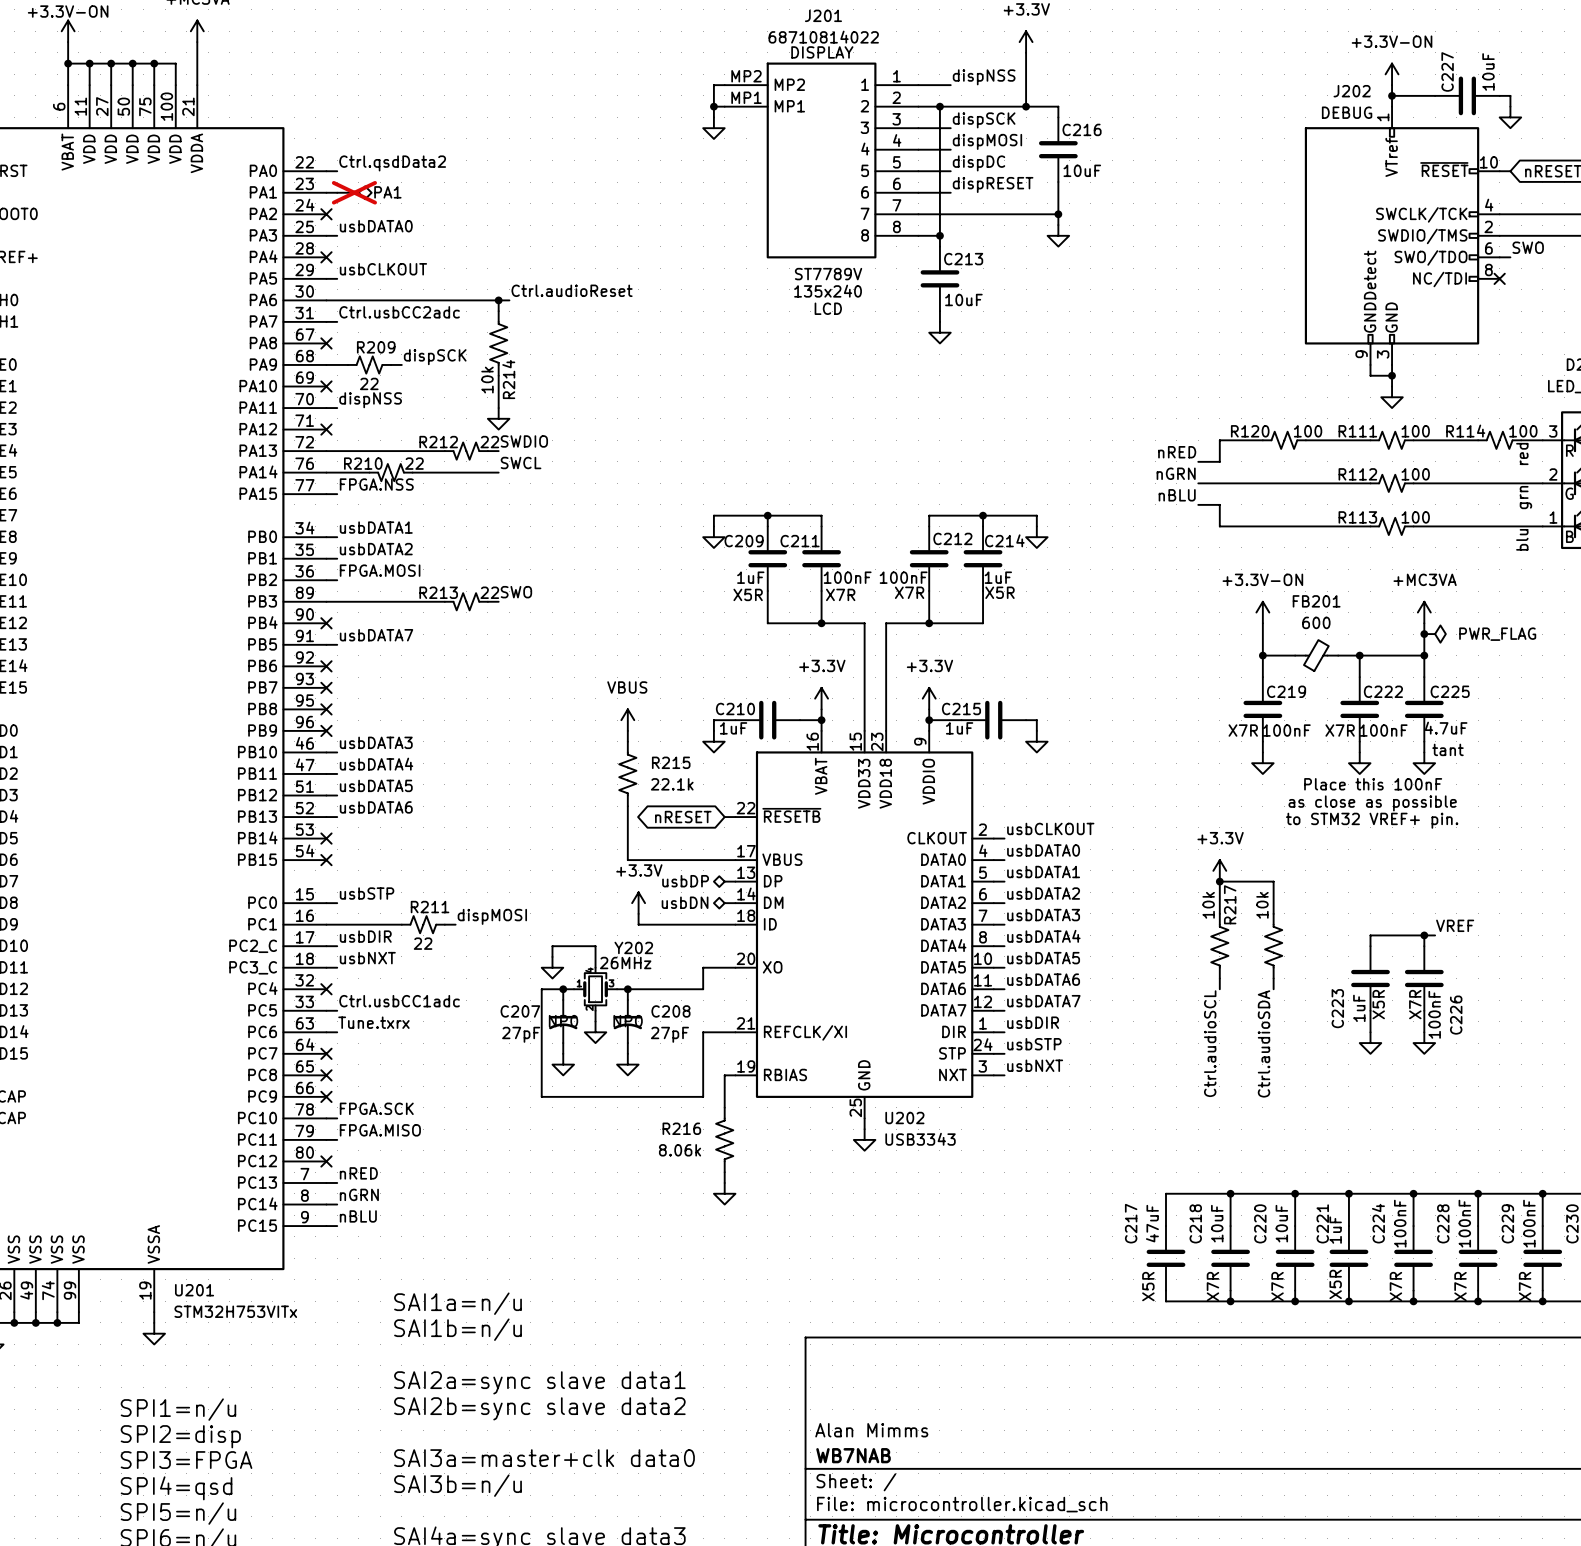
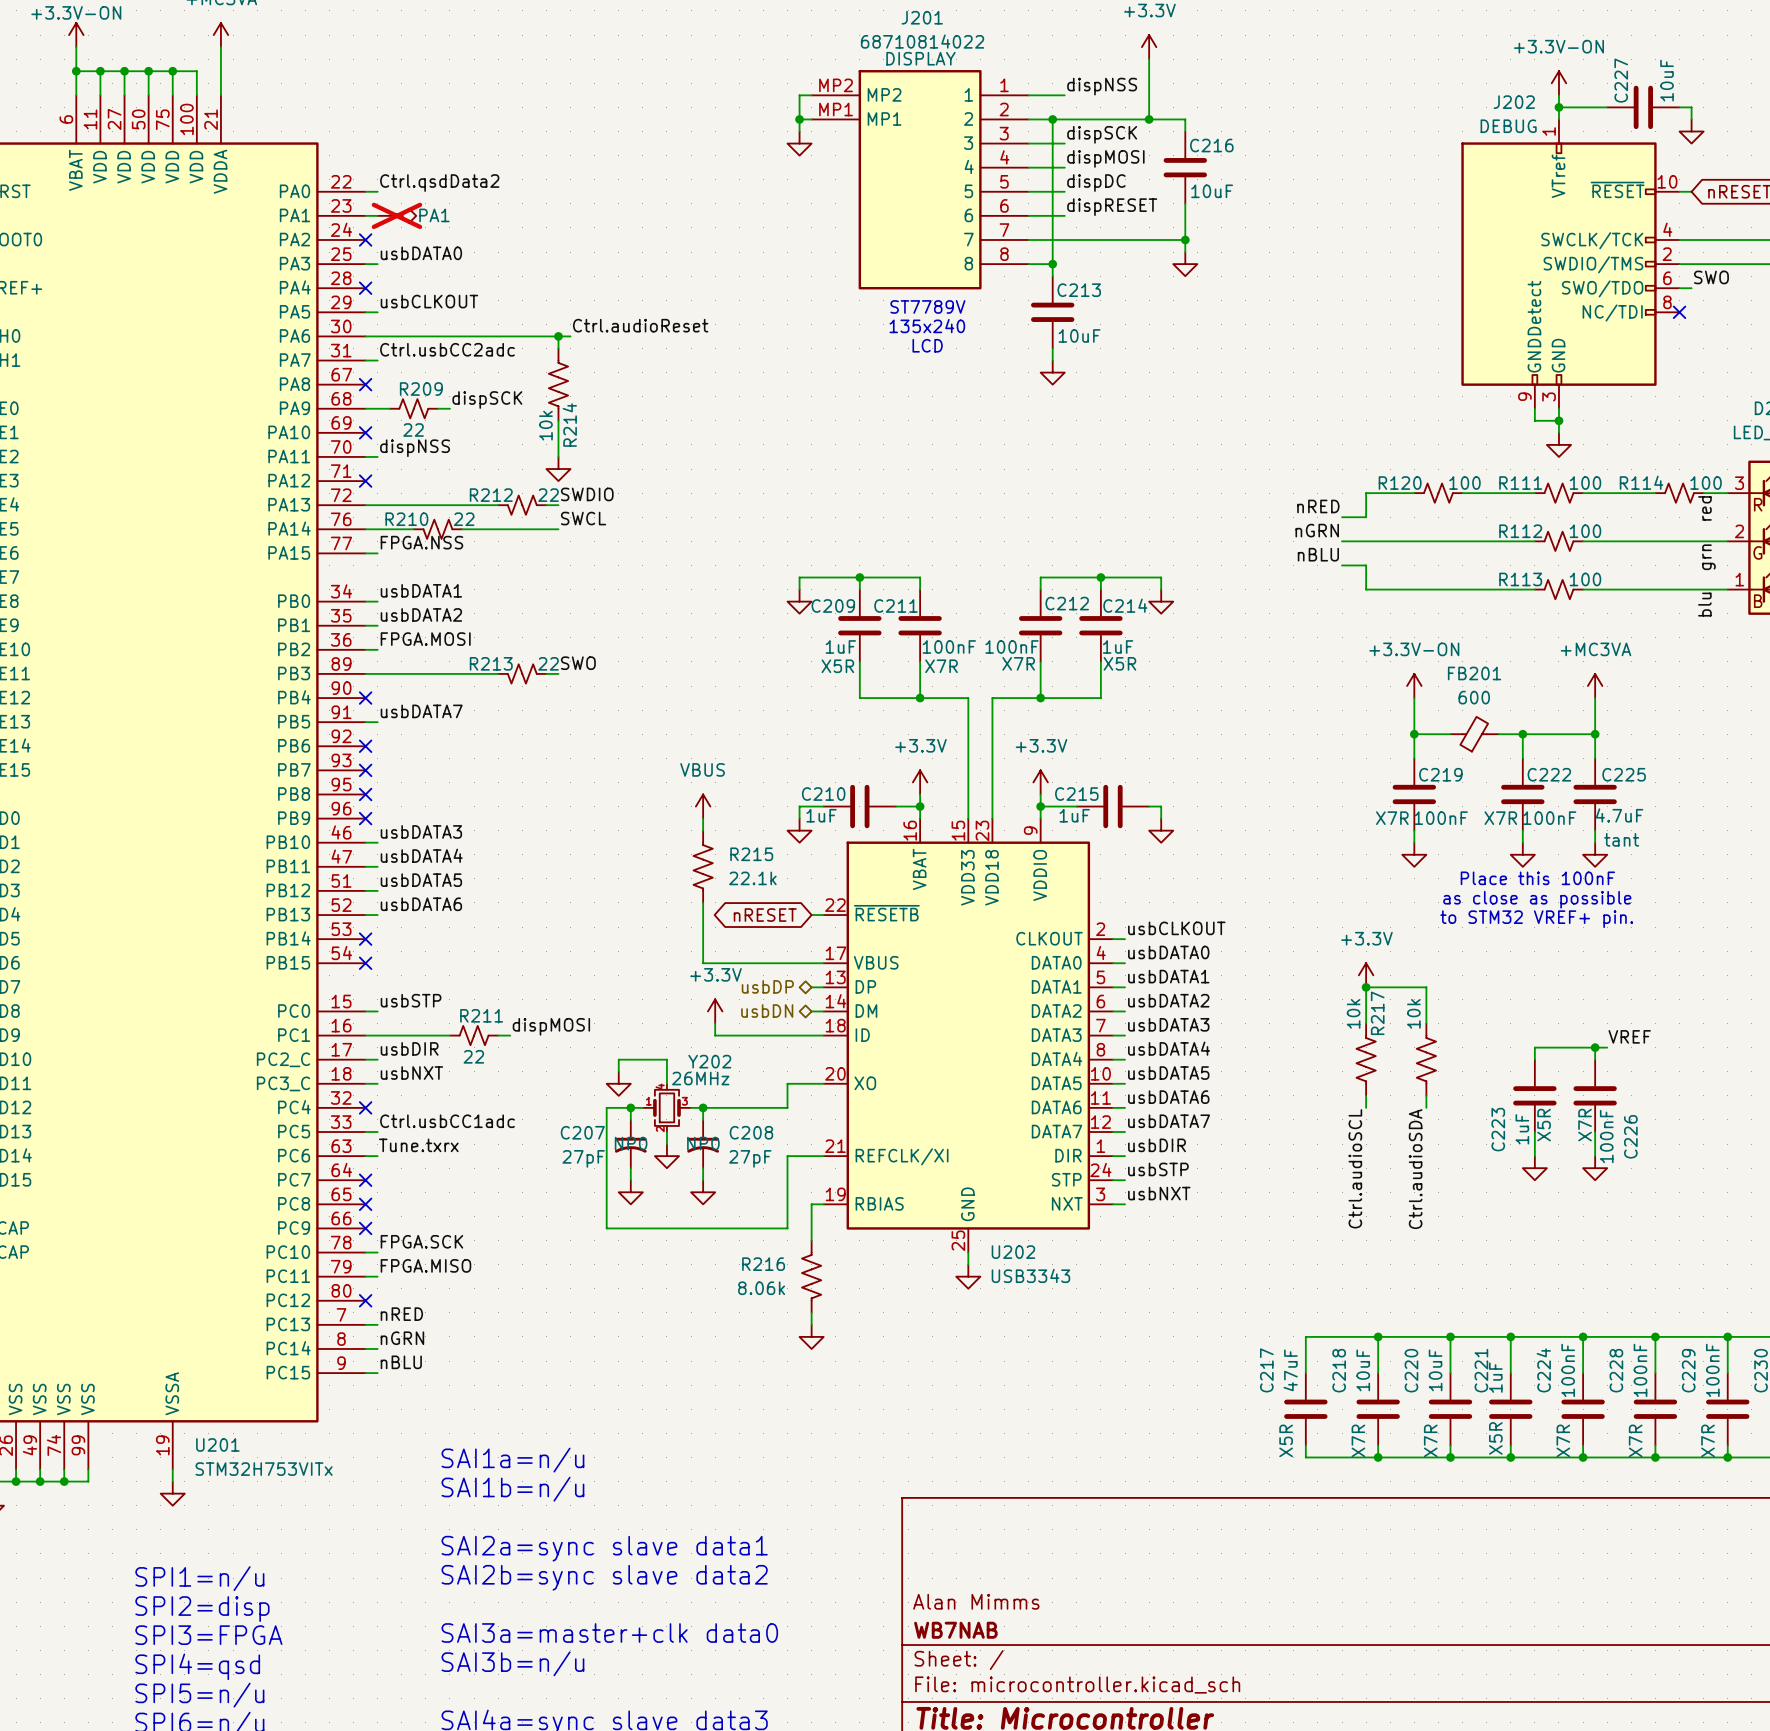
junction: (1424, 634) -> none
power symbol: PWR_FLAG (1435, 634) -> none

